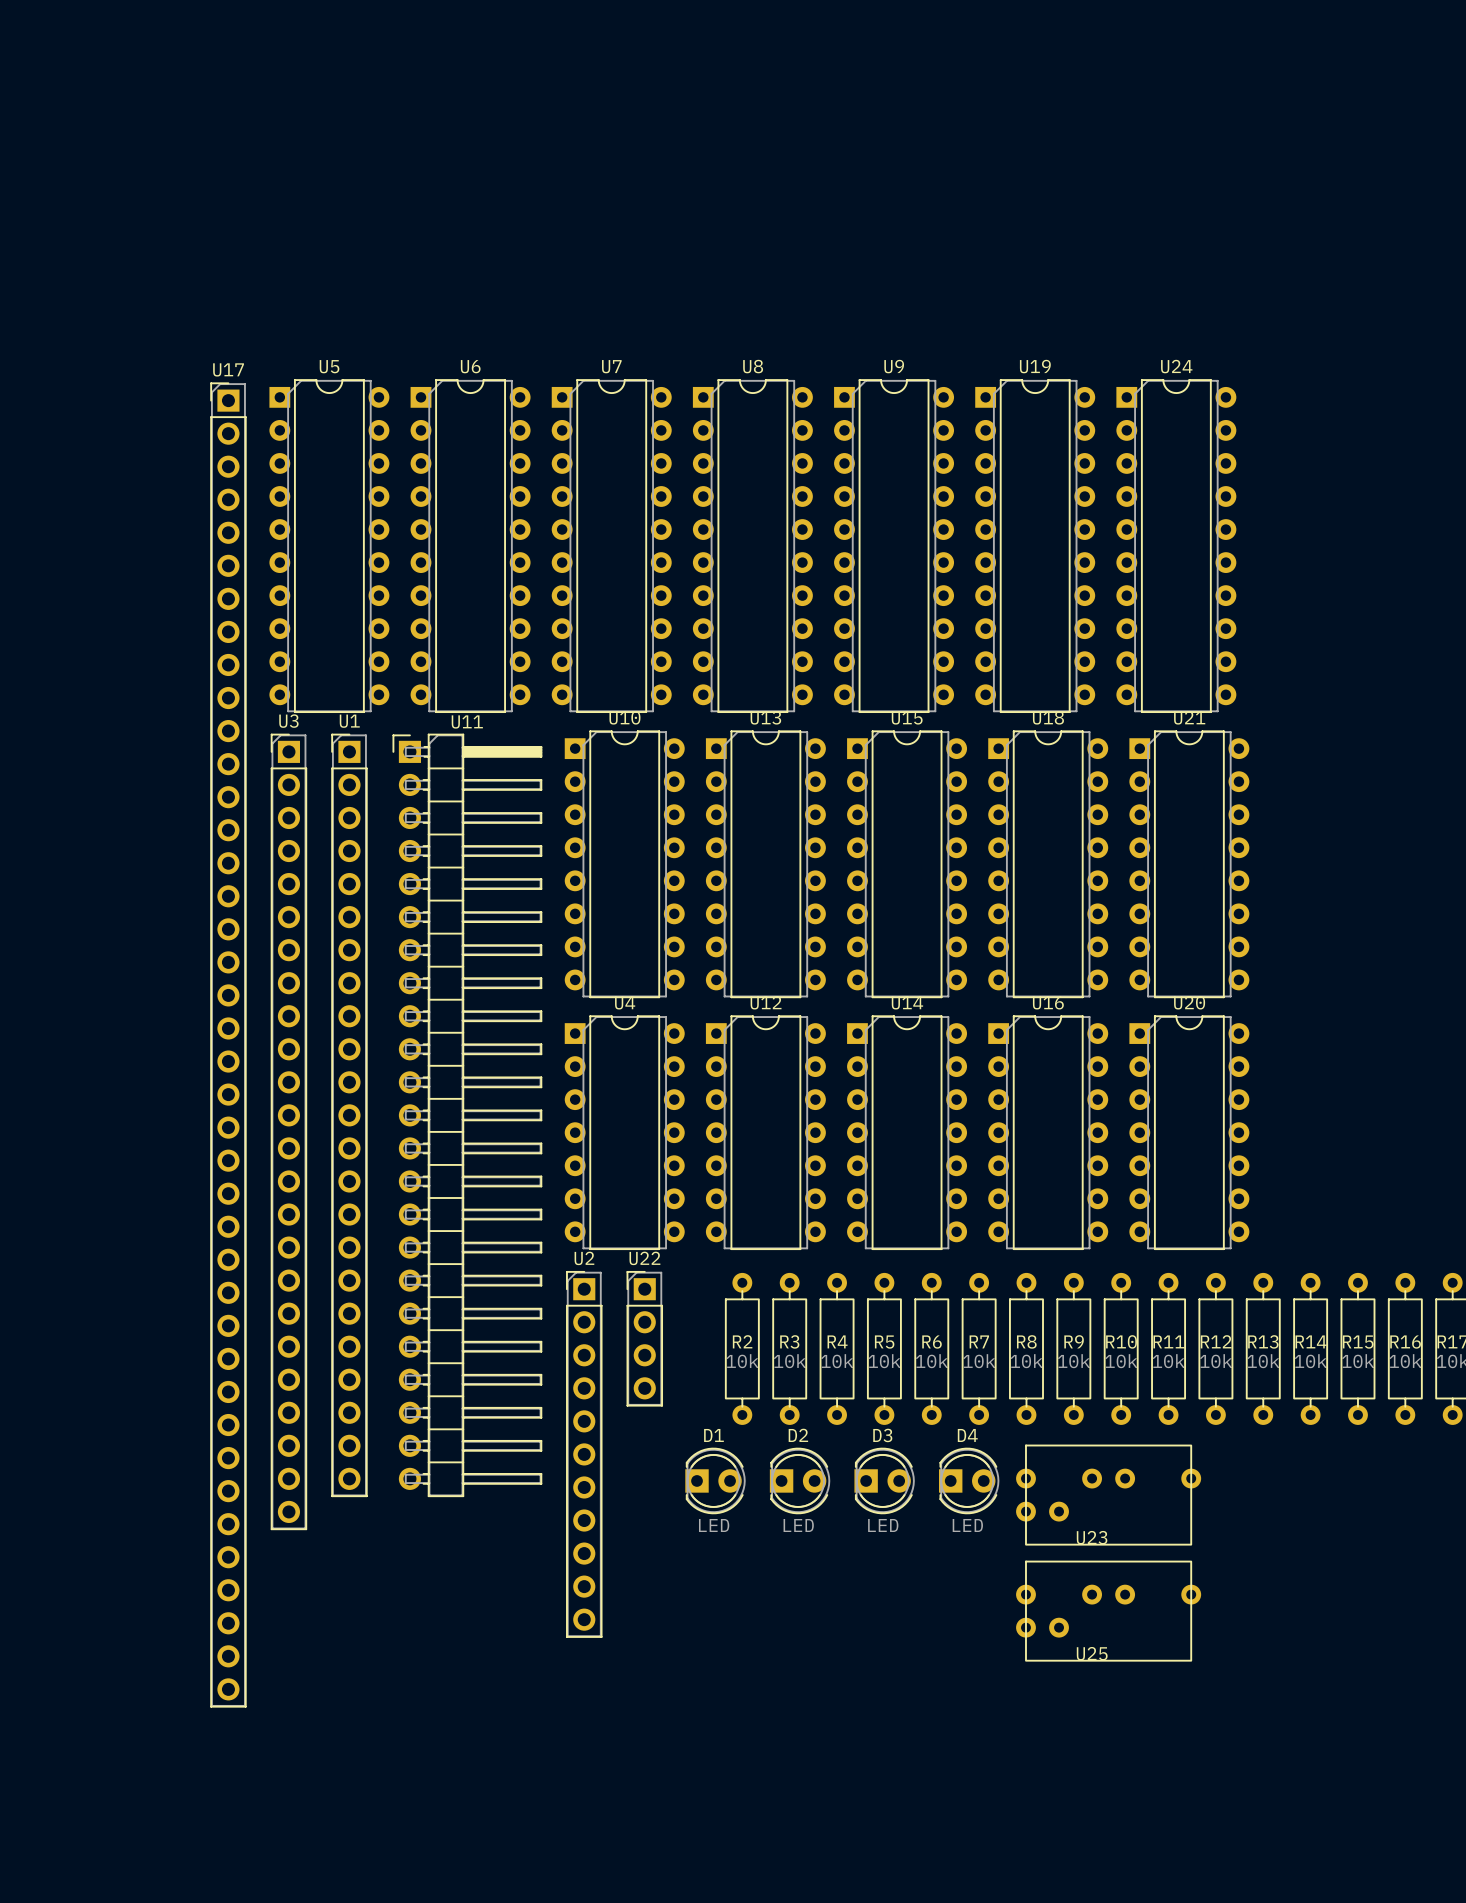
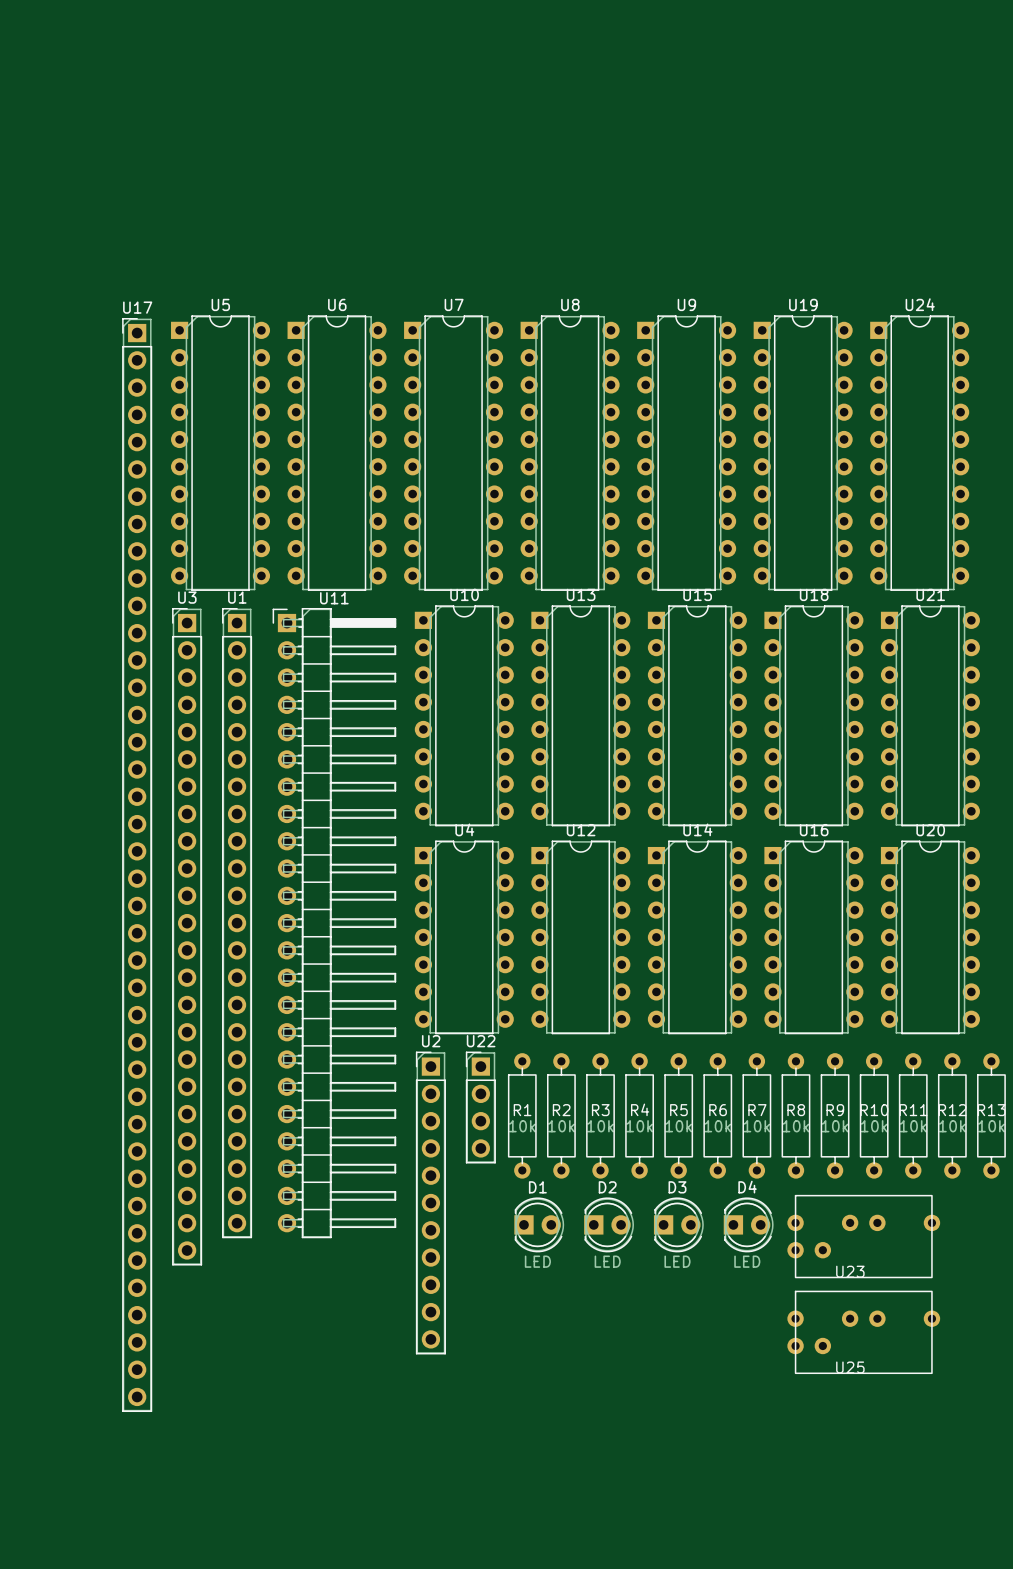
R1: none -> 10k (522, 1115)

